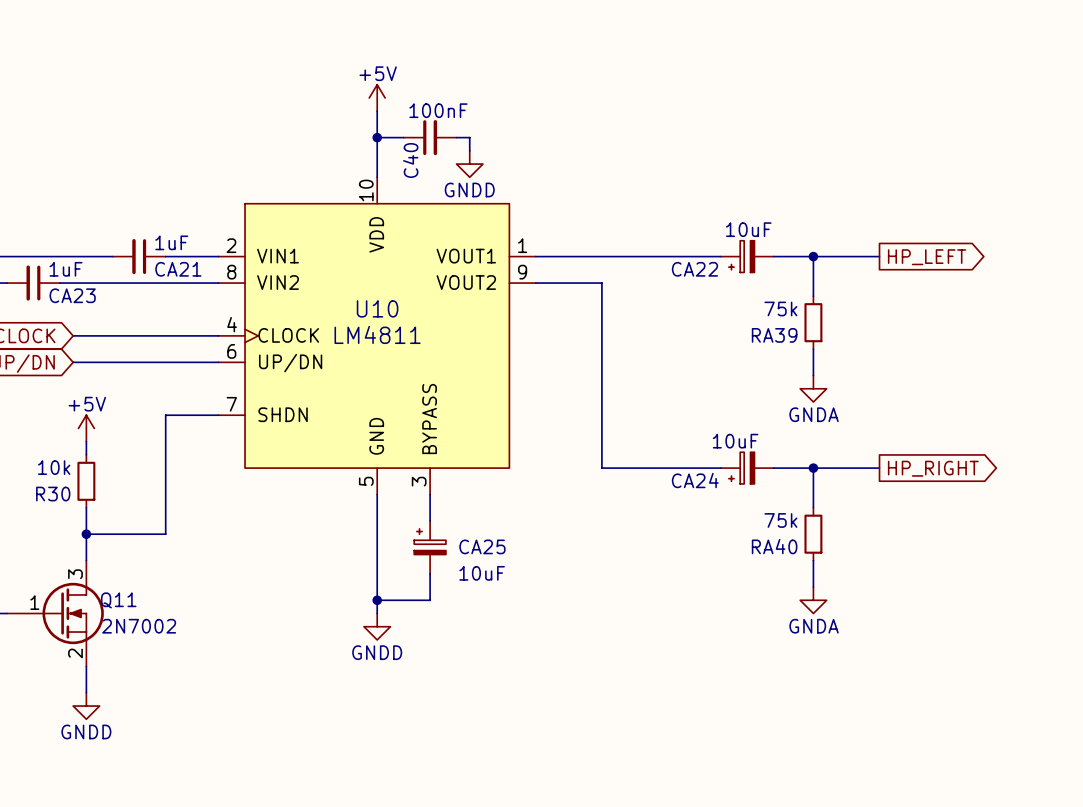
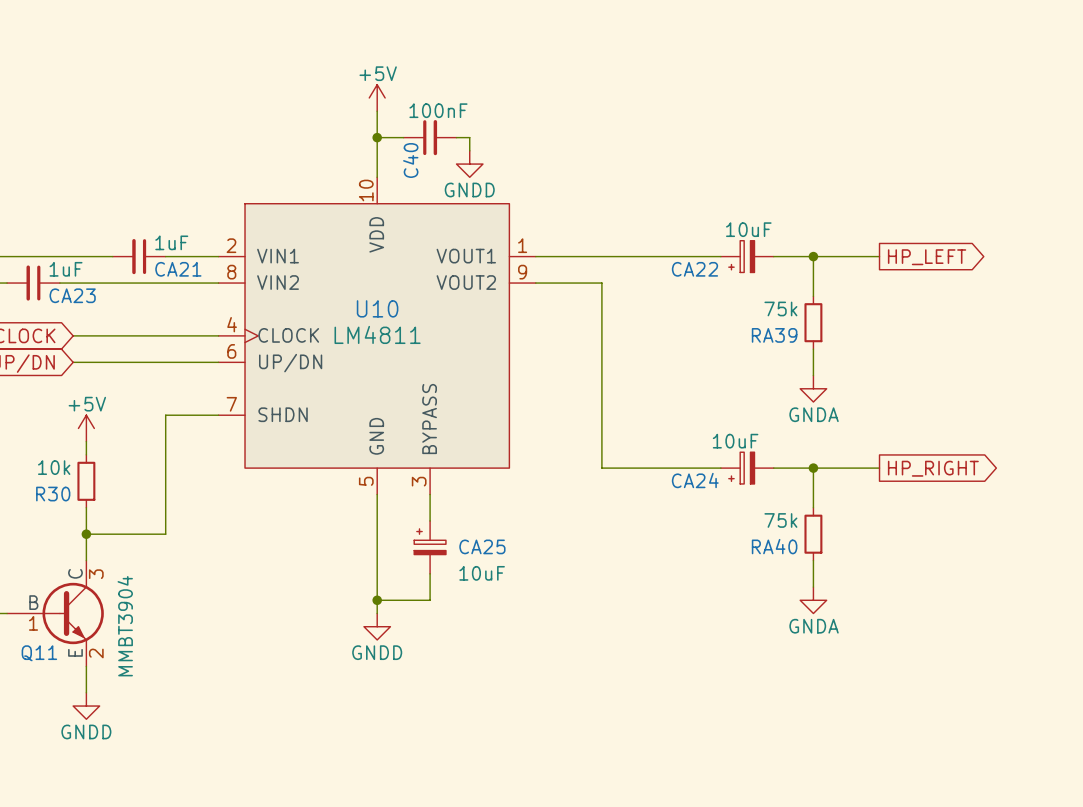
Q11 symbol: [7, 560, 104, 667] -> [7, 560, 104, 667]
Q11 name position: Q11 (118, 600) -> Q11 (39, 653)
Q11 value: 2N7002 (139, 626) -> MMBT3904 (125, 626)

